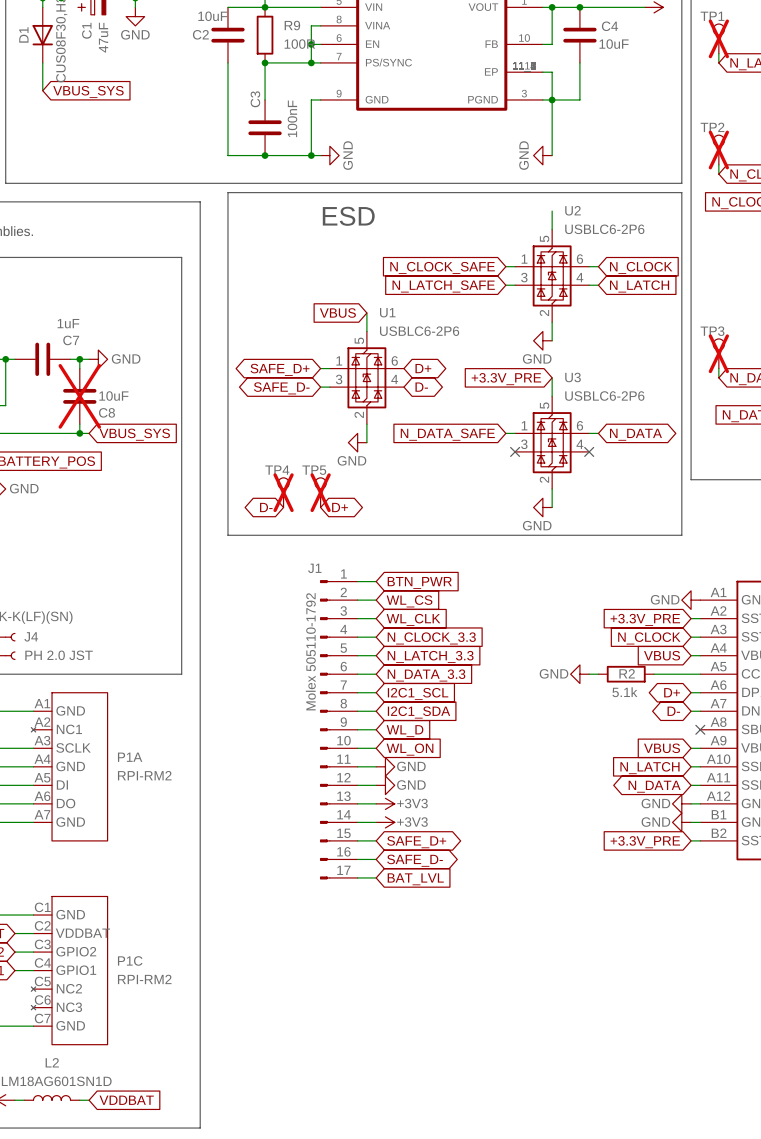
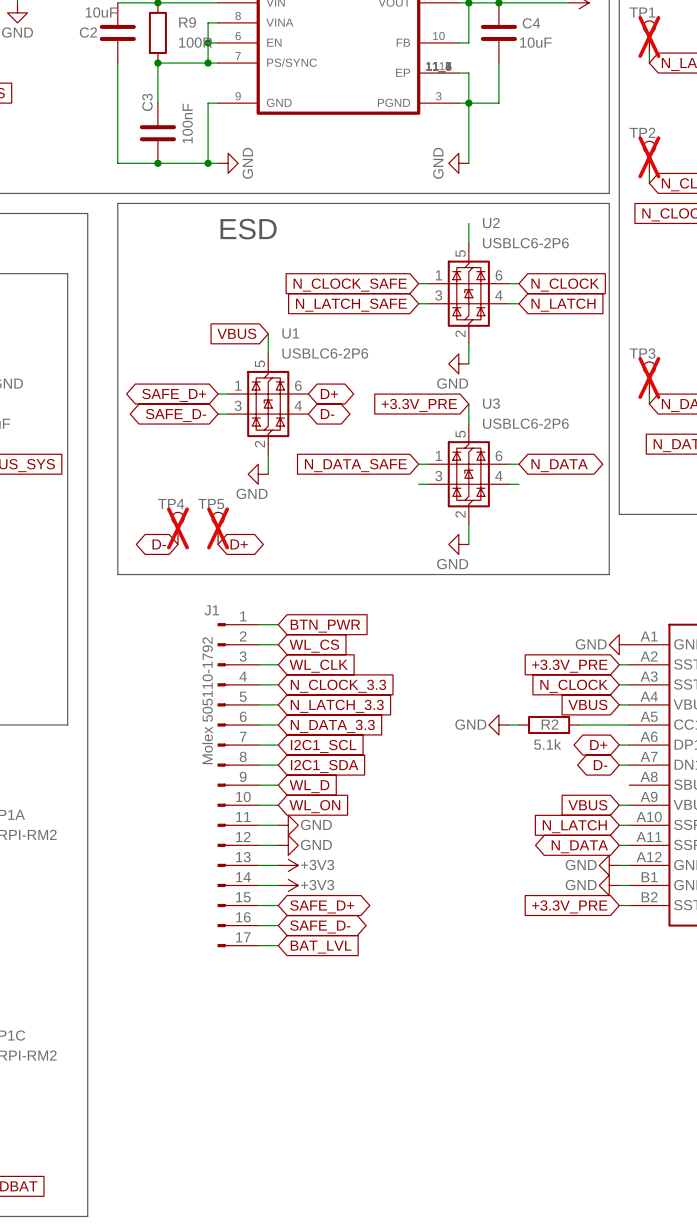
wire: none -> (418, 484) (428, 484)
no-connect mark: (515, 451) -> none
wire: none -> (508, 484) (518, 484)
no-connect mark: (589, 451) -> none
no-connect mark: (700, 729) -> none

